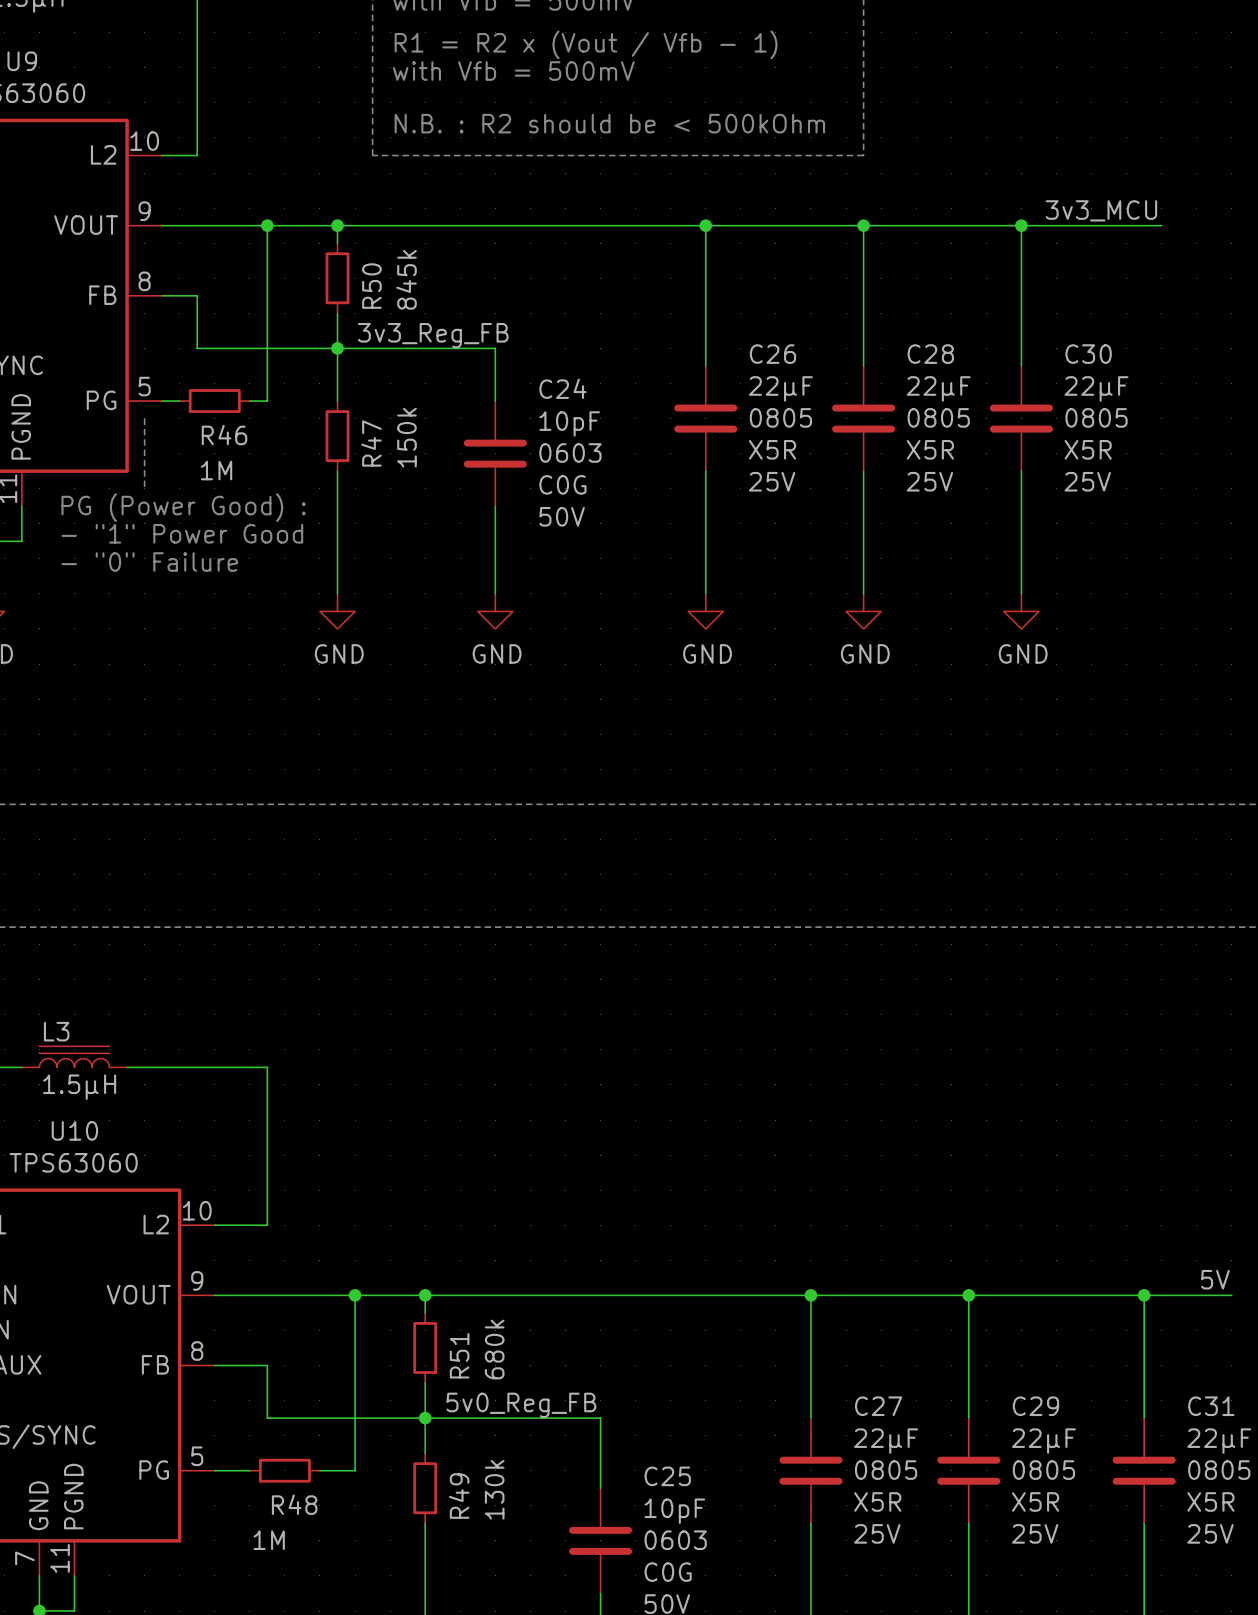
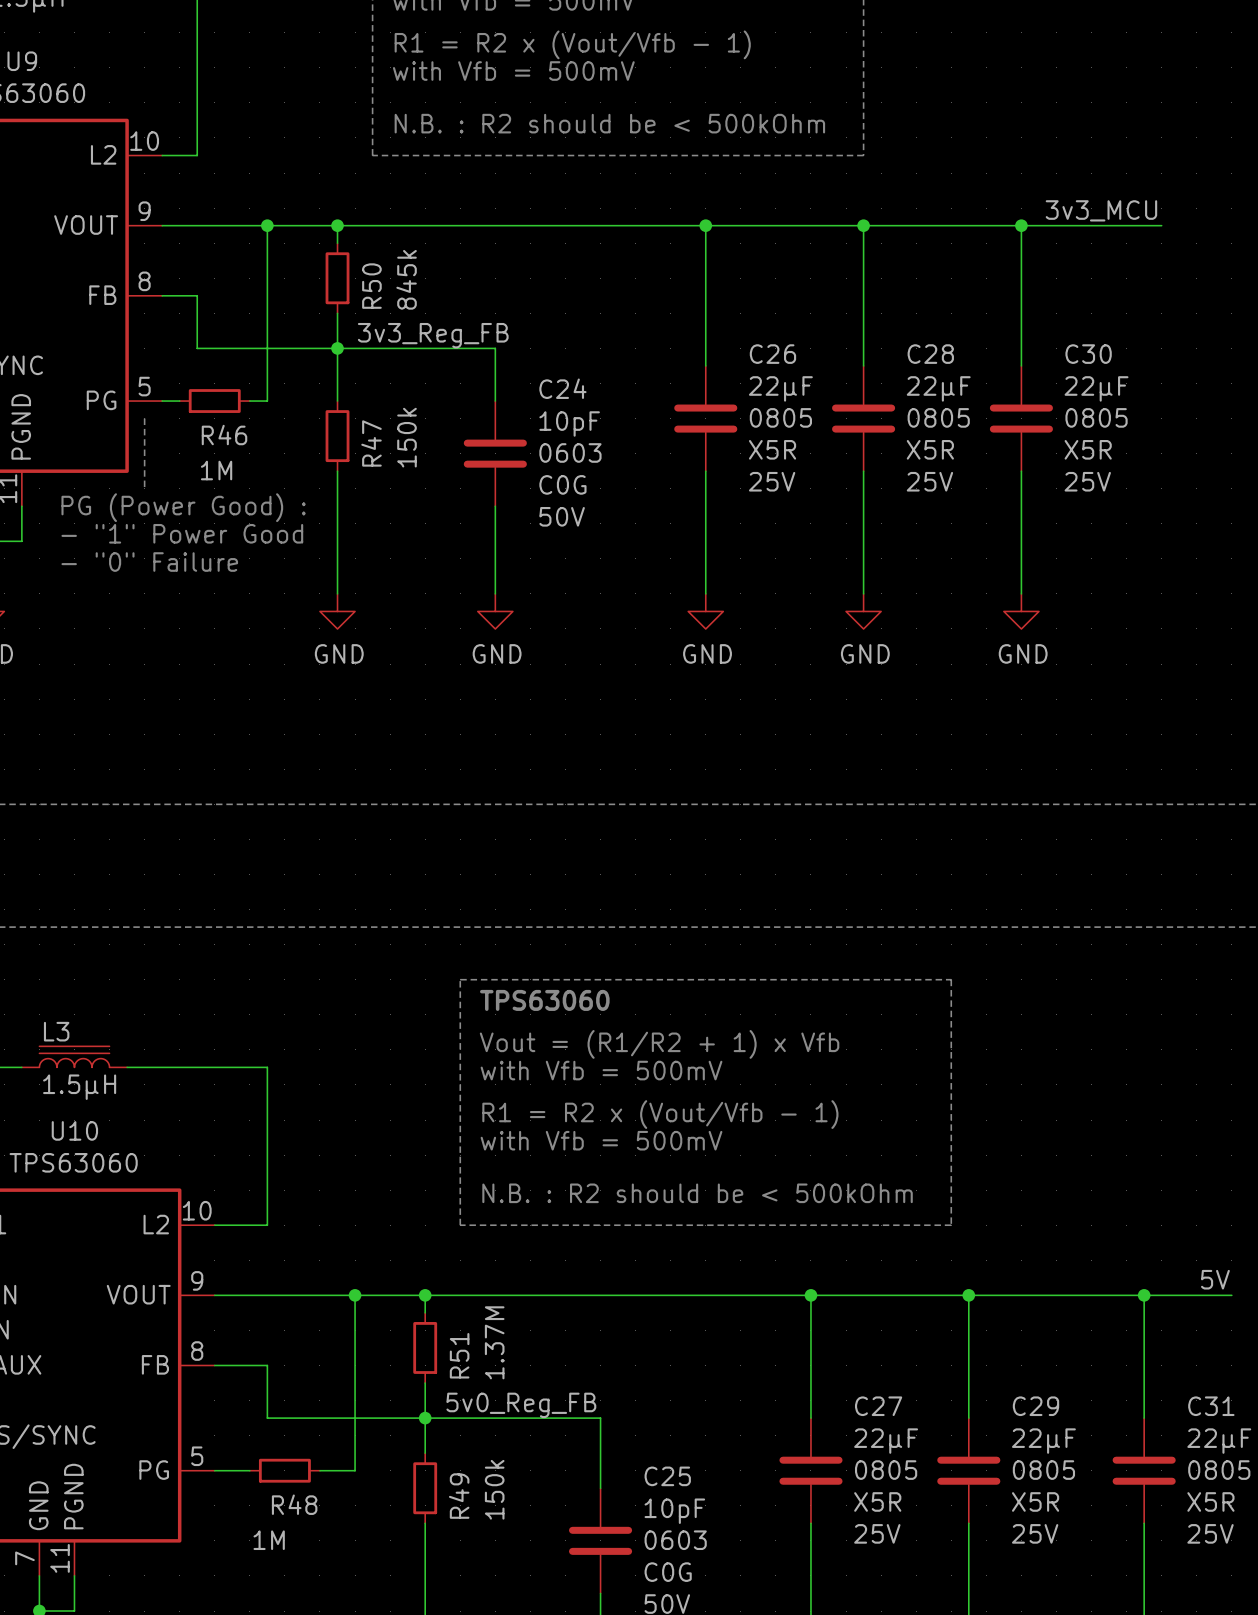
text: R1 = R2 x (Vout / Vfb - 1) (586, 44) -> R1 = R2 x (Vout/Vfb - 1) (572, 44)
line: none -> (460, 979) (951, 979) (951, 1225) (460, 1225) (460, 979)
text: none -> TPS63060 (544, 1000)
text: none -> Vout = (R1/R2 + 1) x Vfb (659, 1044)
text: none -> with Vfb = 500mV (601, 1070)
text: none -> R1 = R2 x (Vout/Vfb - 1) (660, 1114)
text: none -> with Vfb = 500mV (601, 1140)
text: none -> N.B. : R2 should be < 500kOhm (697, 1193)
R51 value: 680k (494, 1349) -> 1.37M (494, 1342)
R49 value: 130k (494, 1489) -> 150k (494, 1489)

